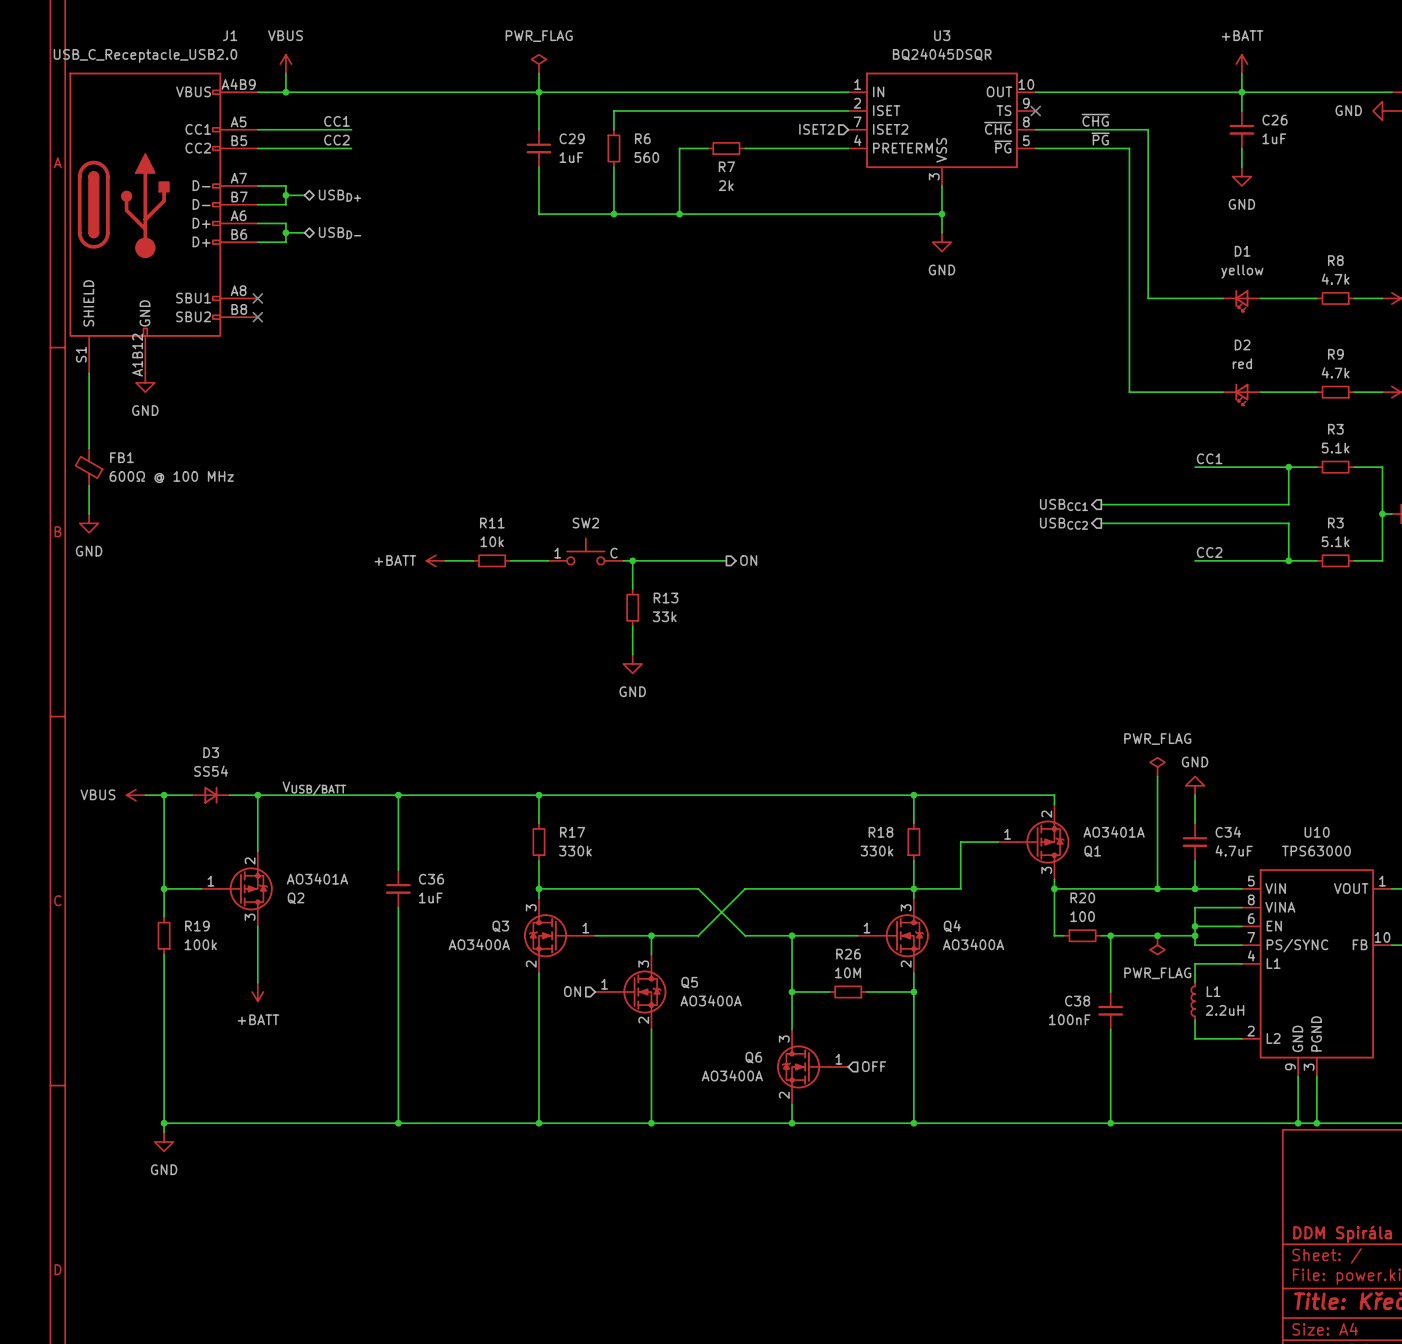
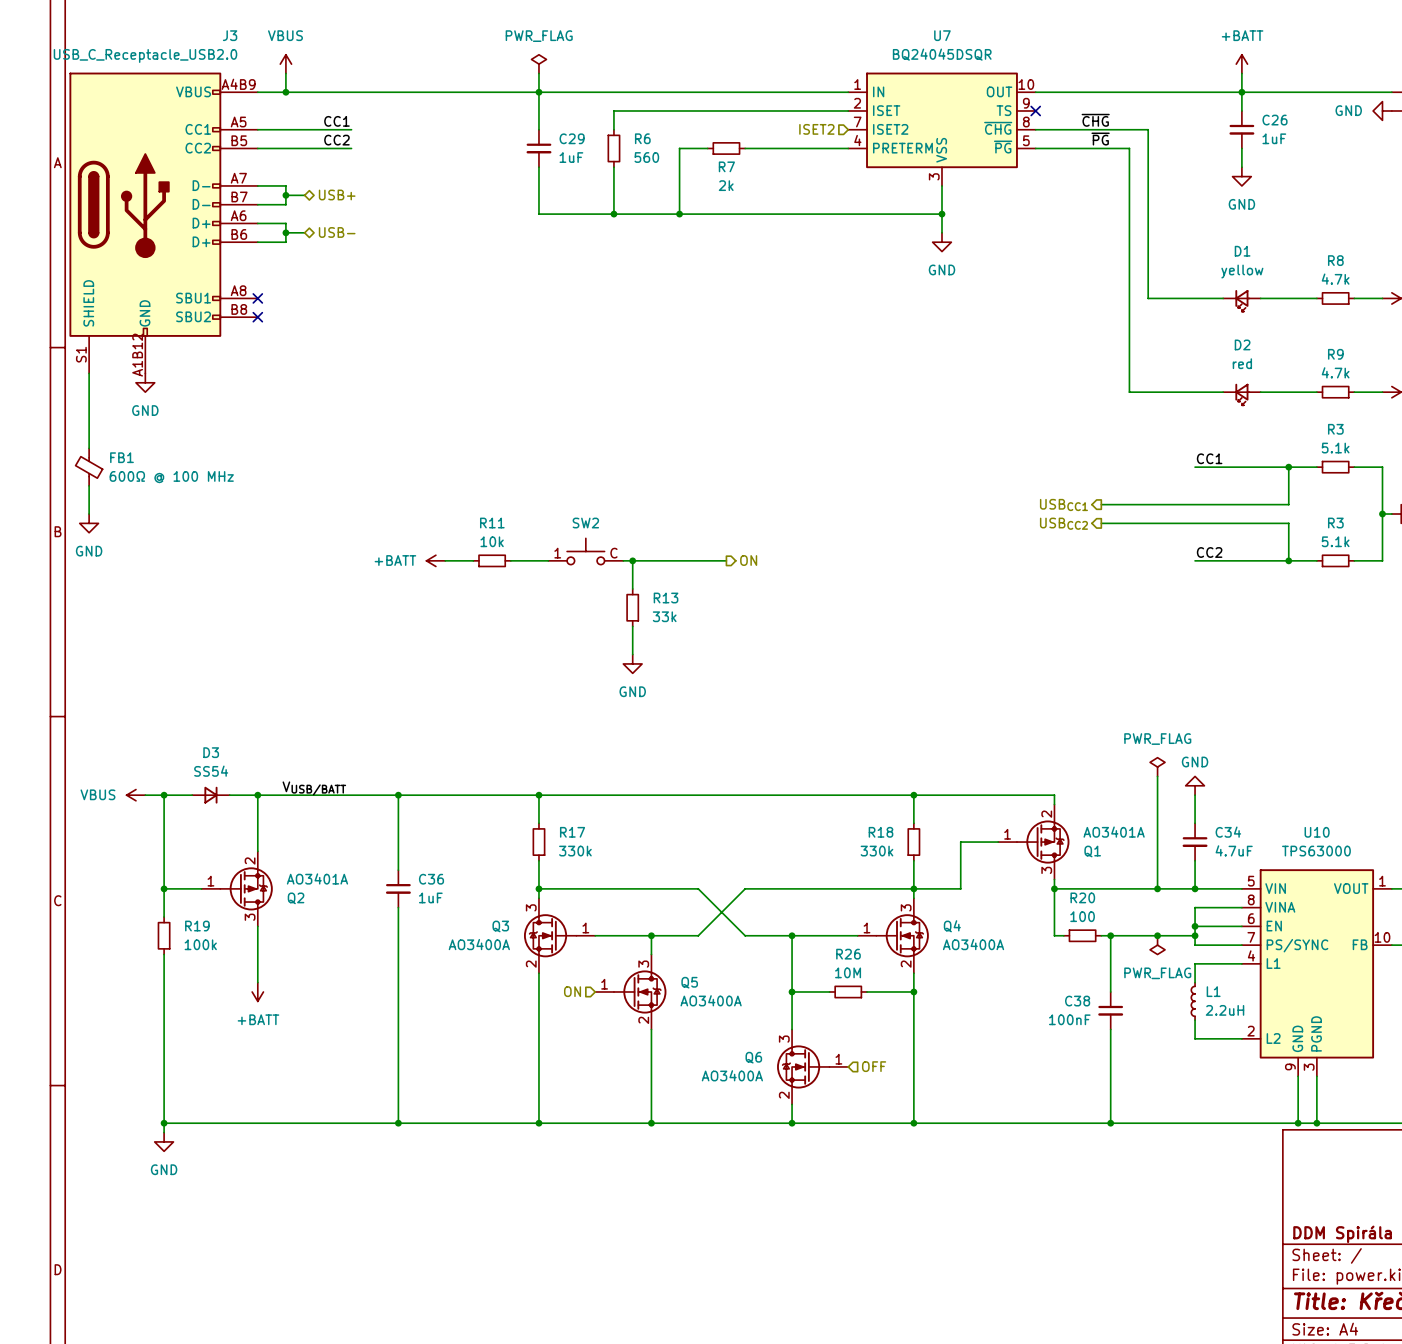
J1 name: J1 (230, 35) -> J3 (230, 35)
U3 name: U3 (942, 35) -> U7 (942, 35)
hierarchical label: USBD+ (339, 195) -> USB+ (337, 194)
hierarchical label: USBD- (339, 233) -> USB- (337, 232)

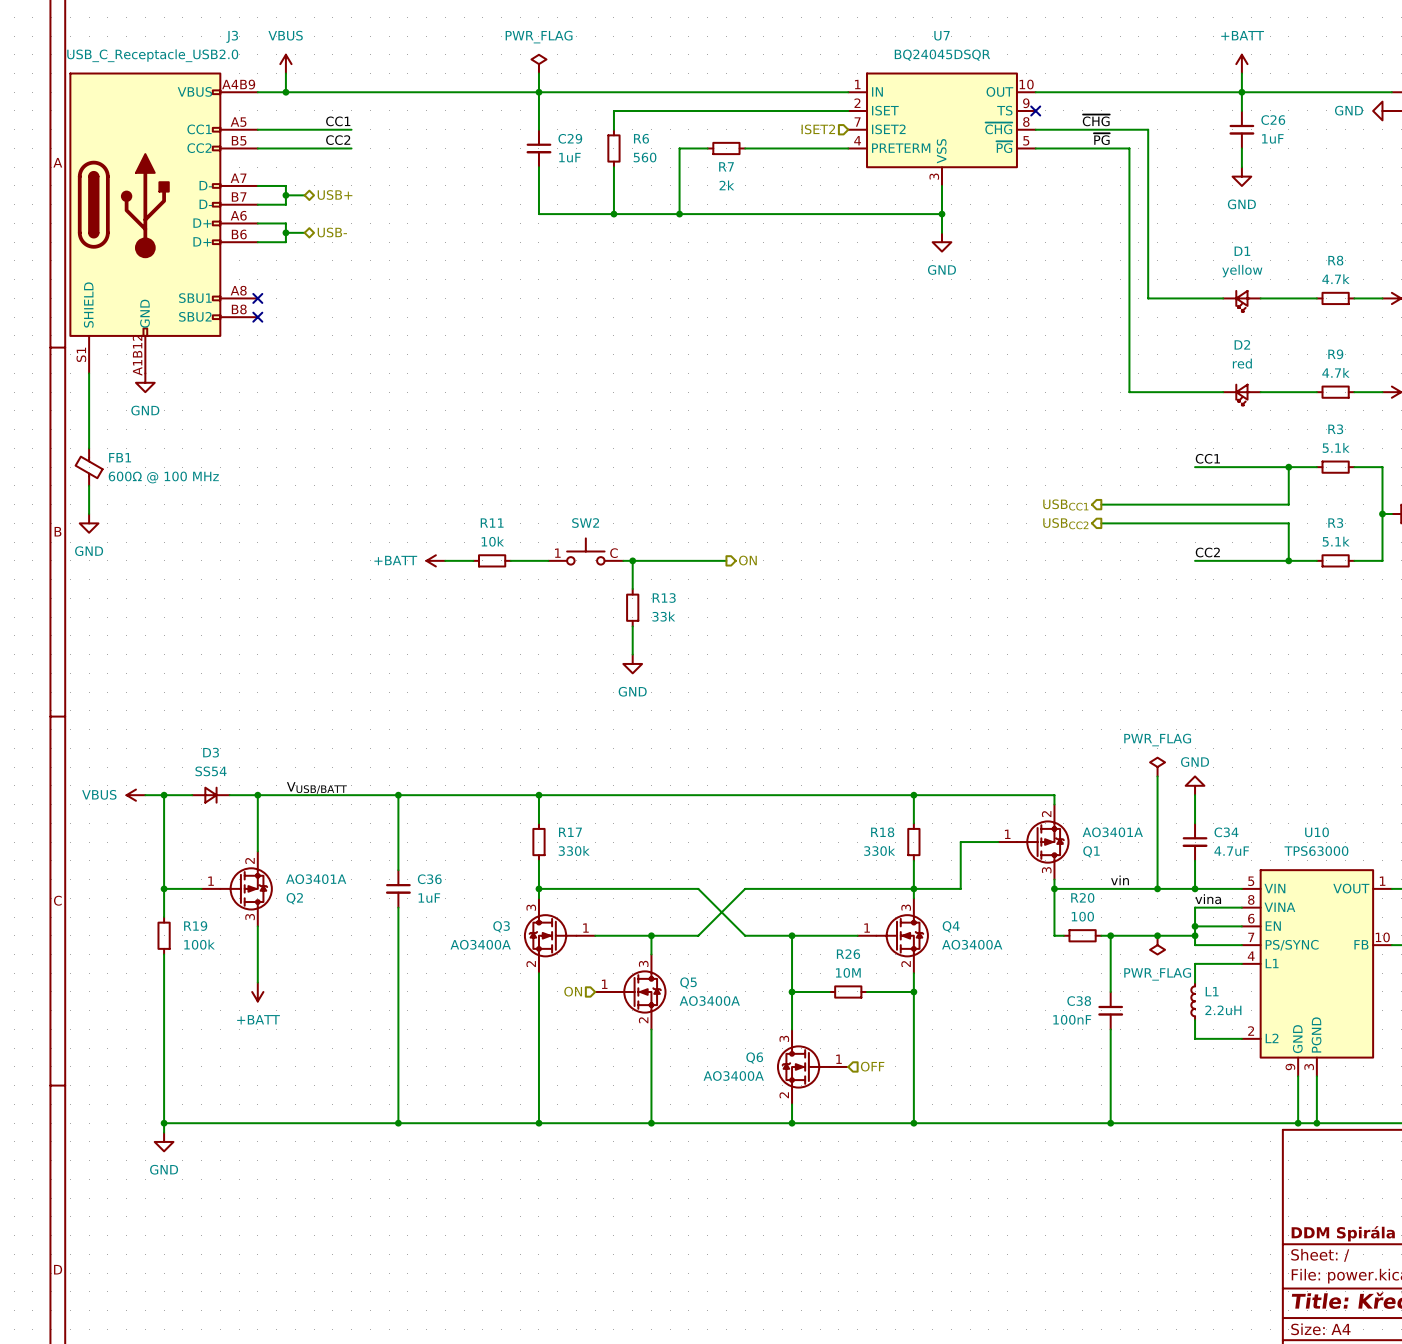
label: none -> vin (1120, 880)
label: none -> vina (1208, 899)

